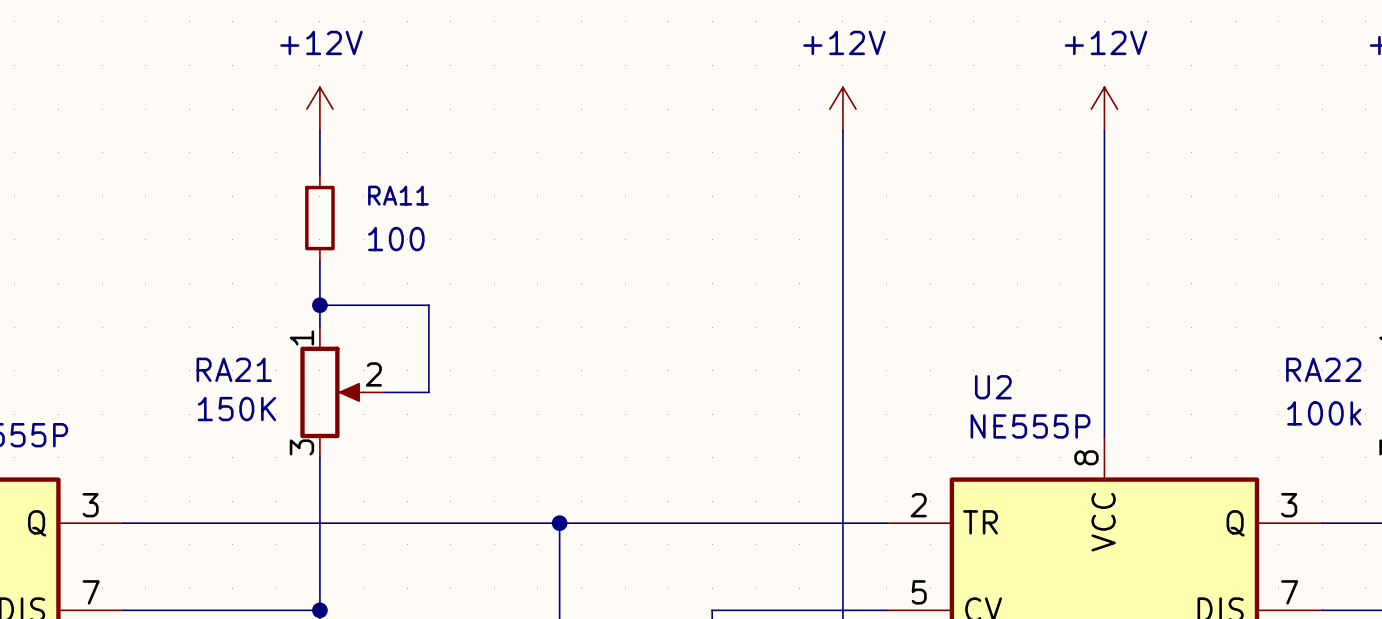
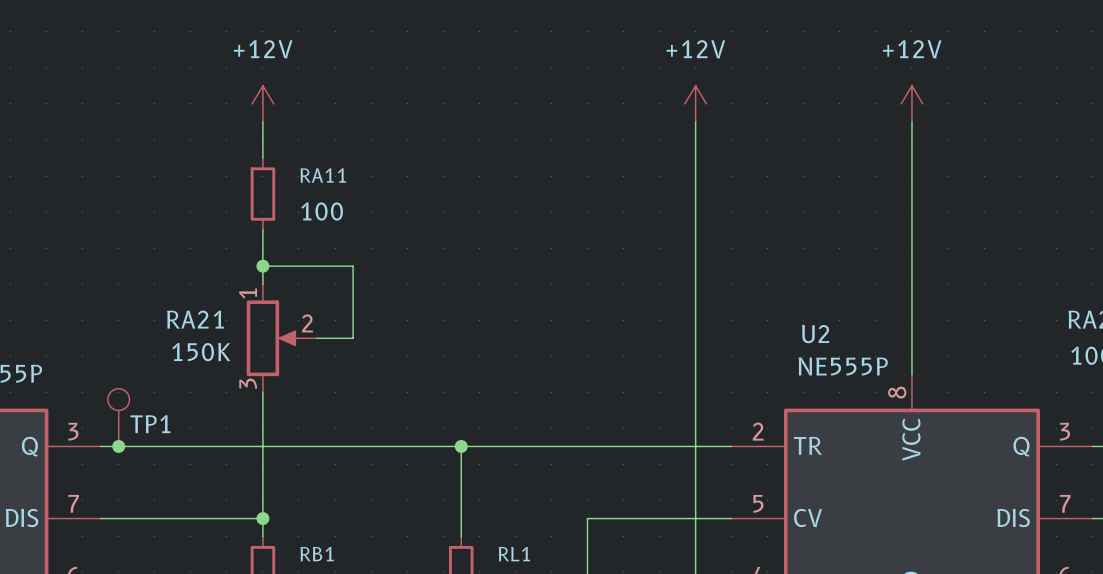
TP1: none -> (118, 417)
junction: none -> (118, 446)

